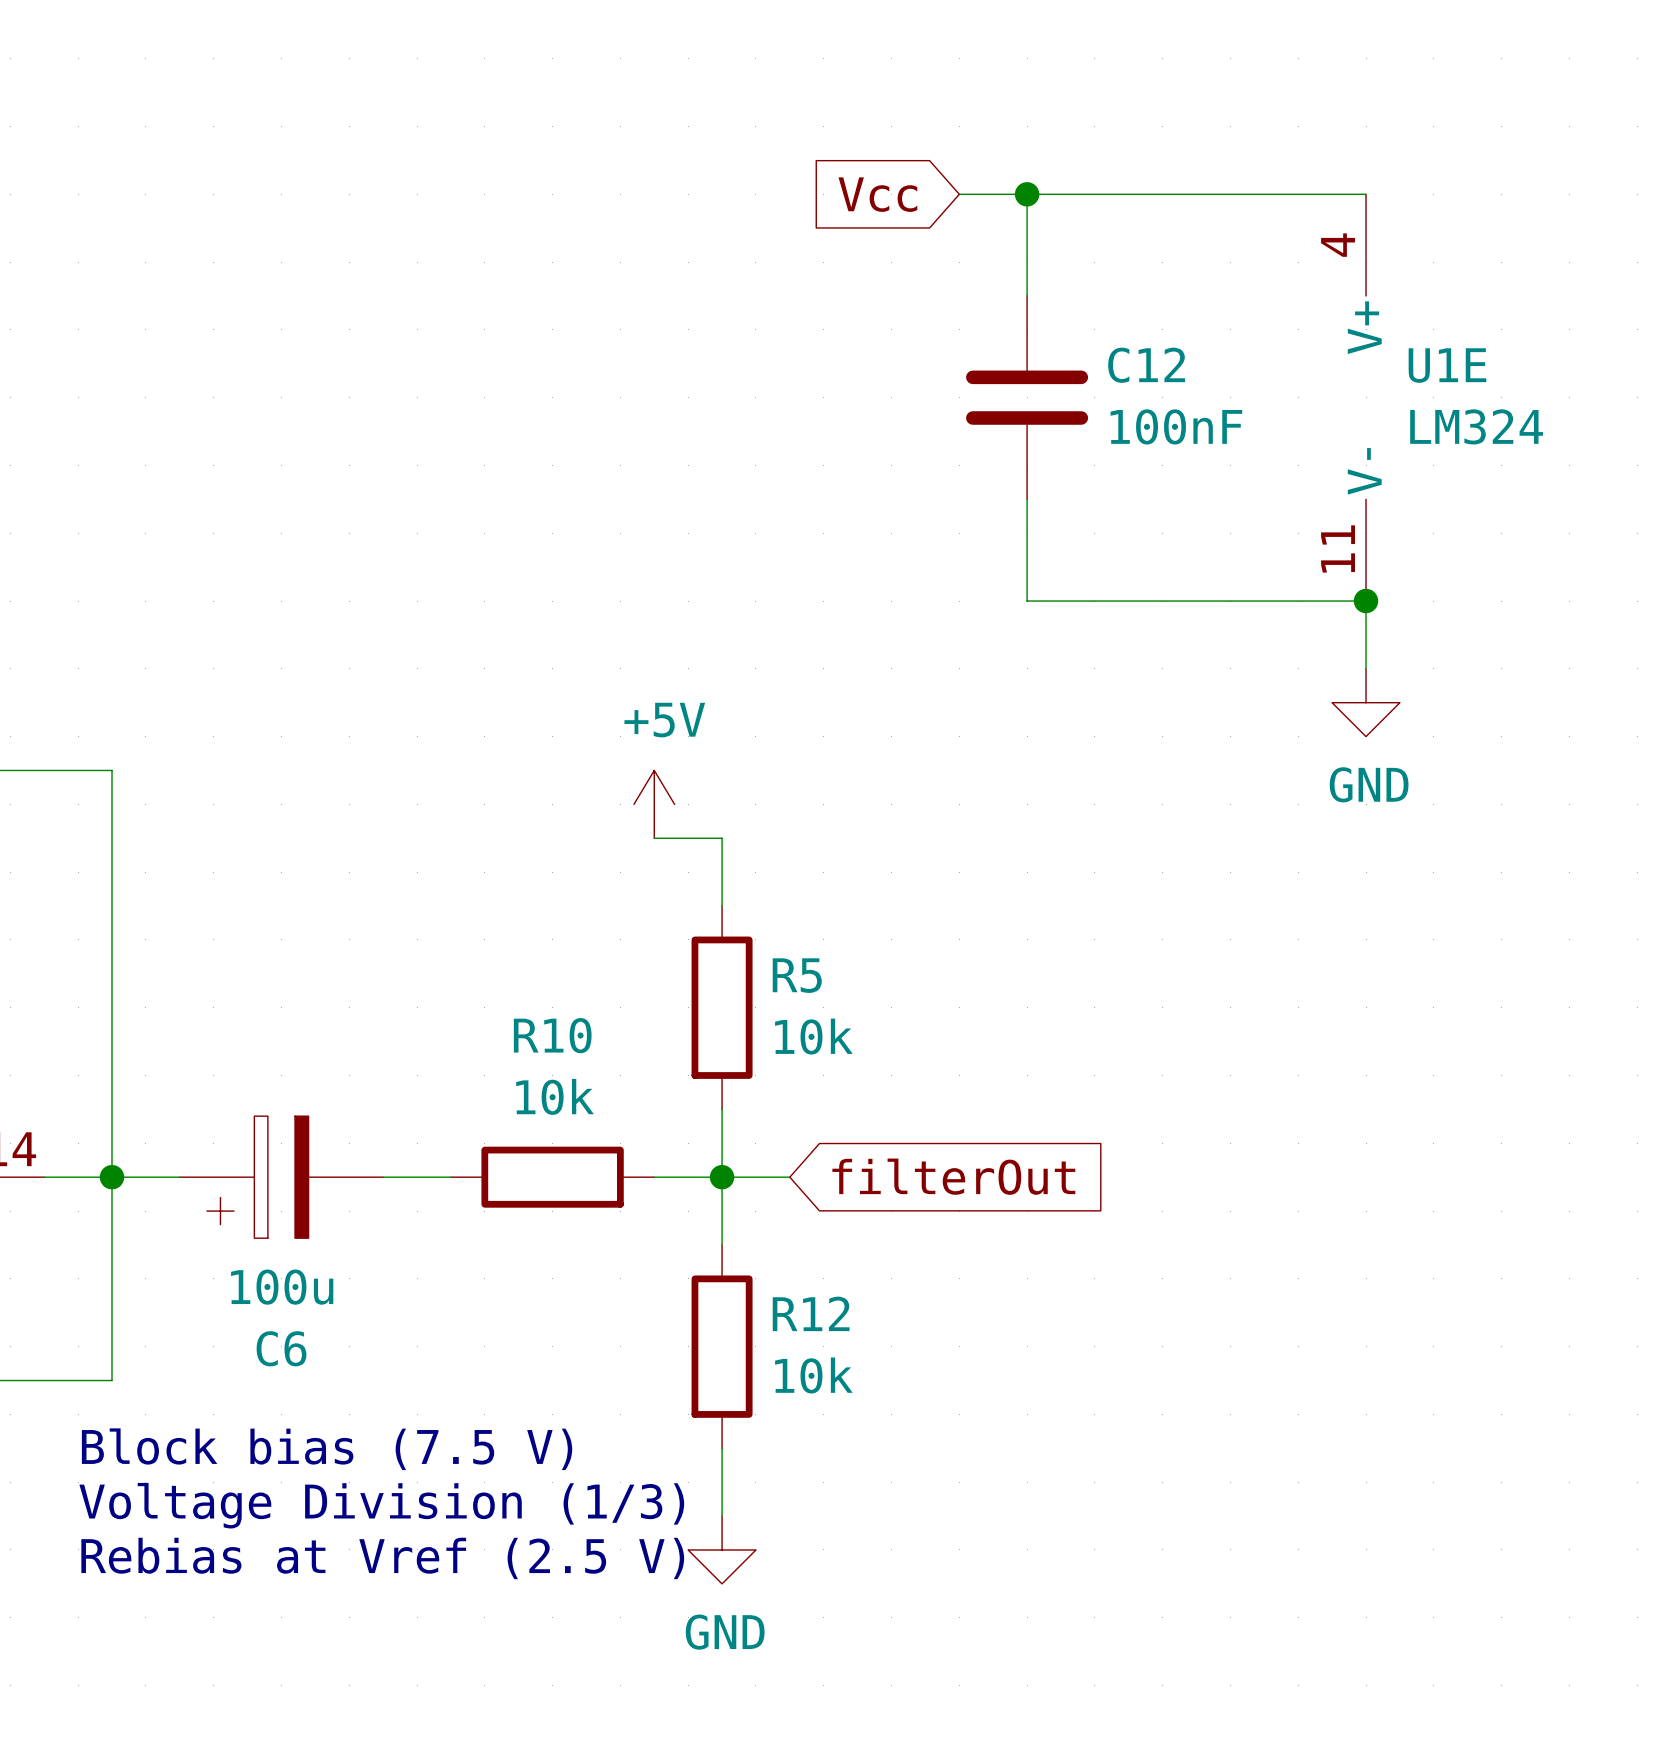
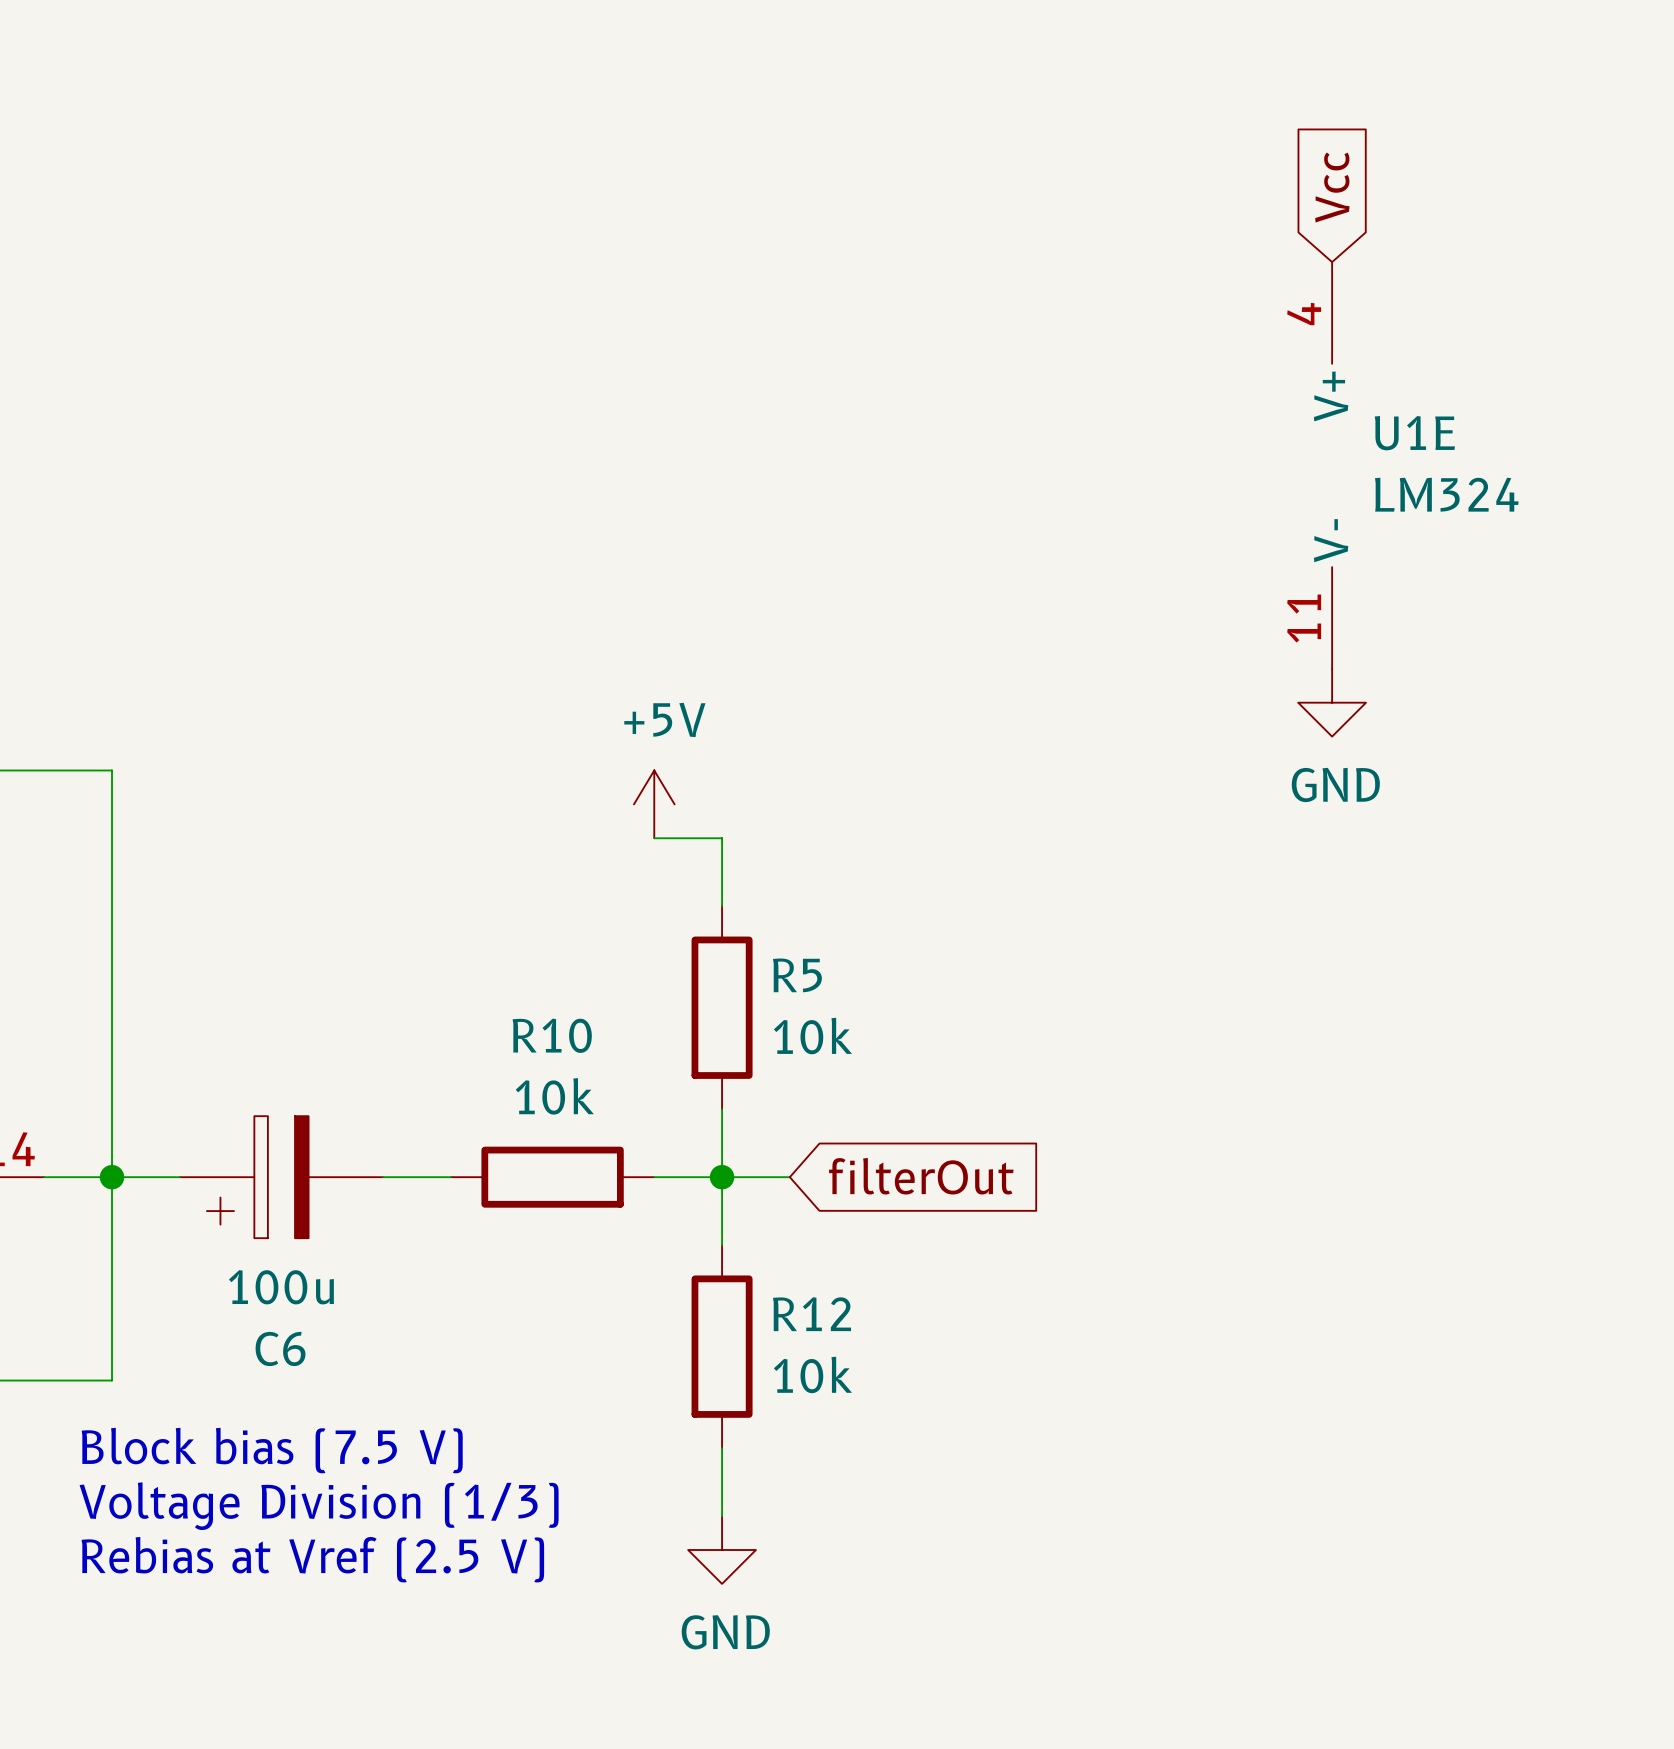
global label rotation: 0° (877, 194) -> 90° clockwise (1332, 187)
global label position: Vcc (877, 194) -> Vcc (1332, 187)
wire: (959, 194) (1366, 194) -> none
wire: (1027, 194) (1027, 295) -> none
junction: (1027, 194) -> none
C12: 100nF (1027, 397) -> none
U1E position: (1366, 397) -> (1332, 465)
wire: (1027, 499) (1027, 601) (1366, 601) (1366, 668) -> none
junction: (1366, 601) -> none
power symbol position: GND (1366, 702) -> GND (1332, 702)

